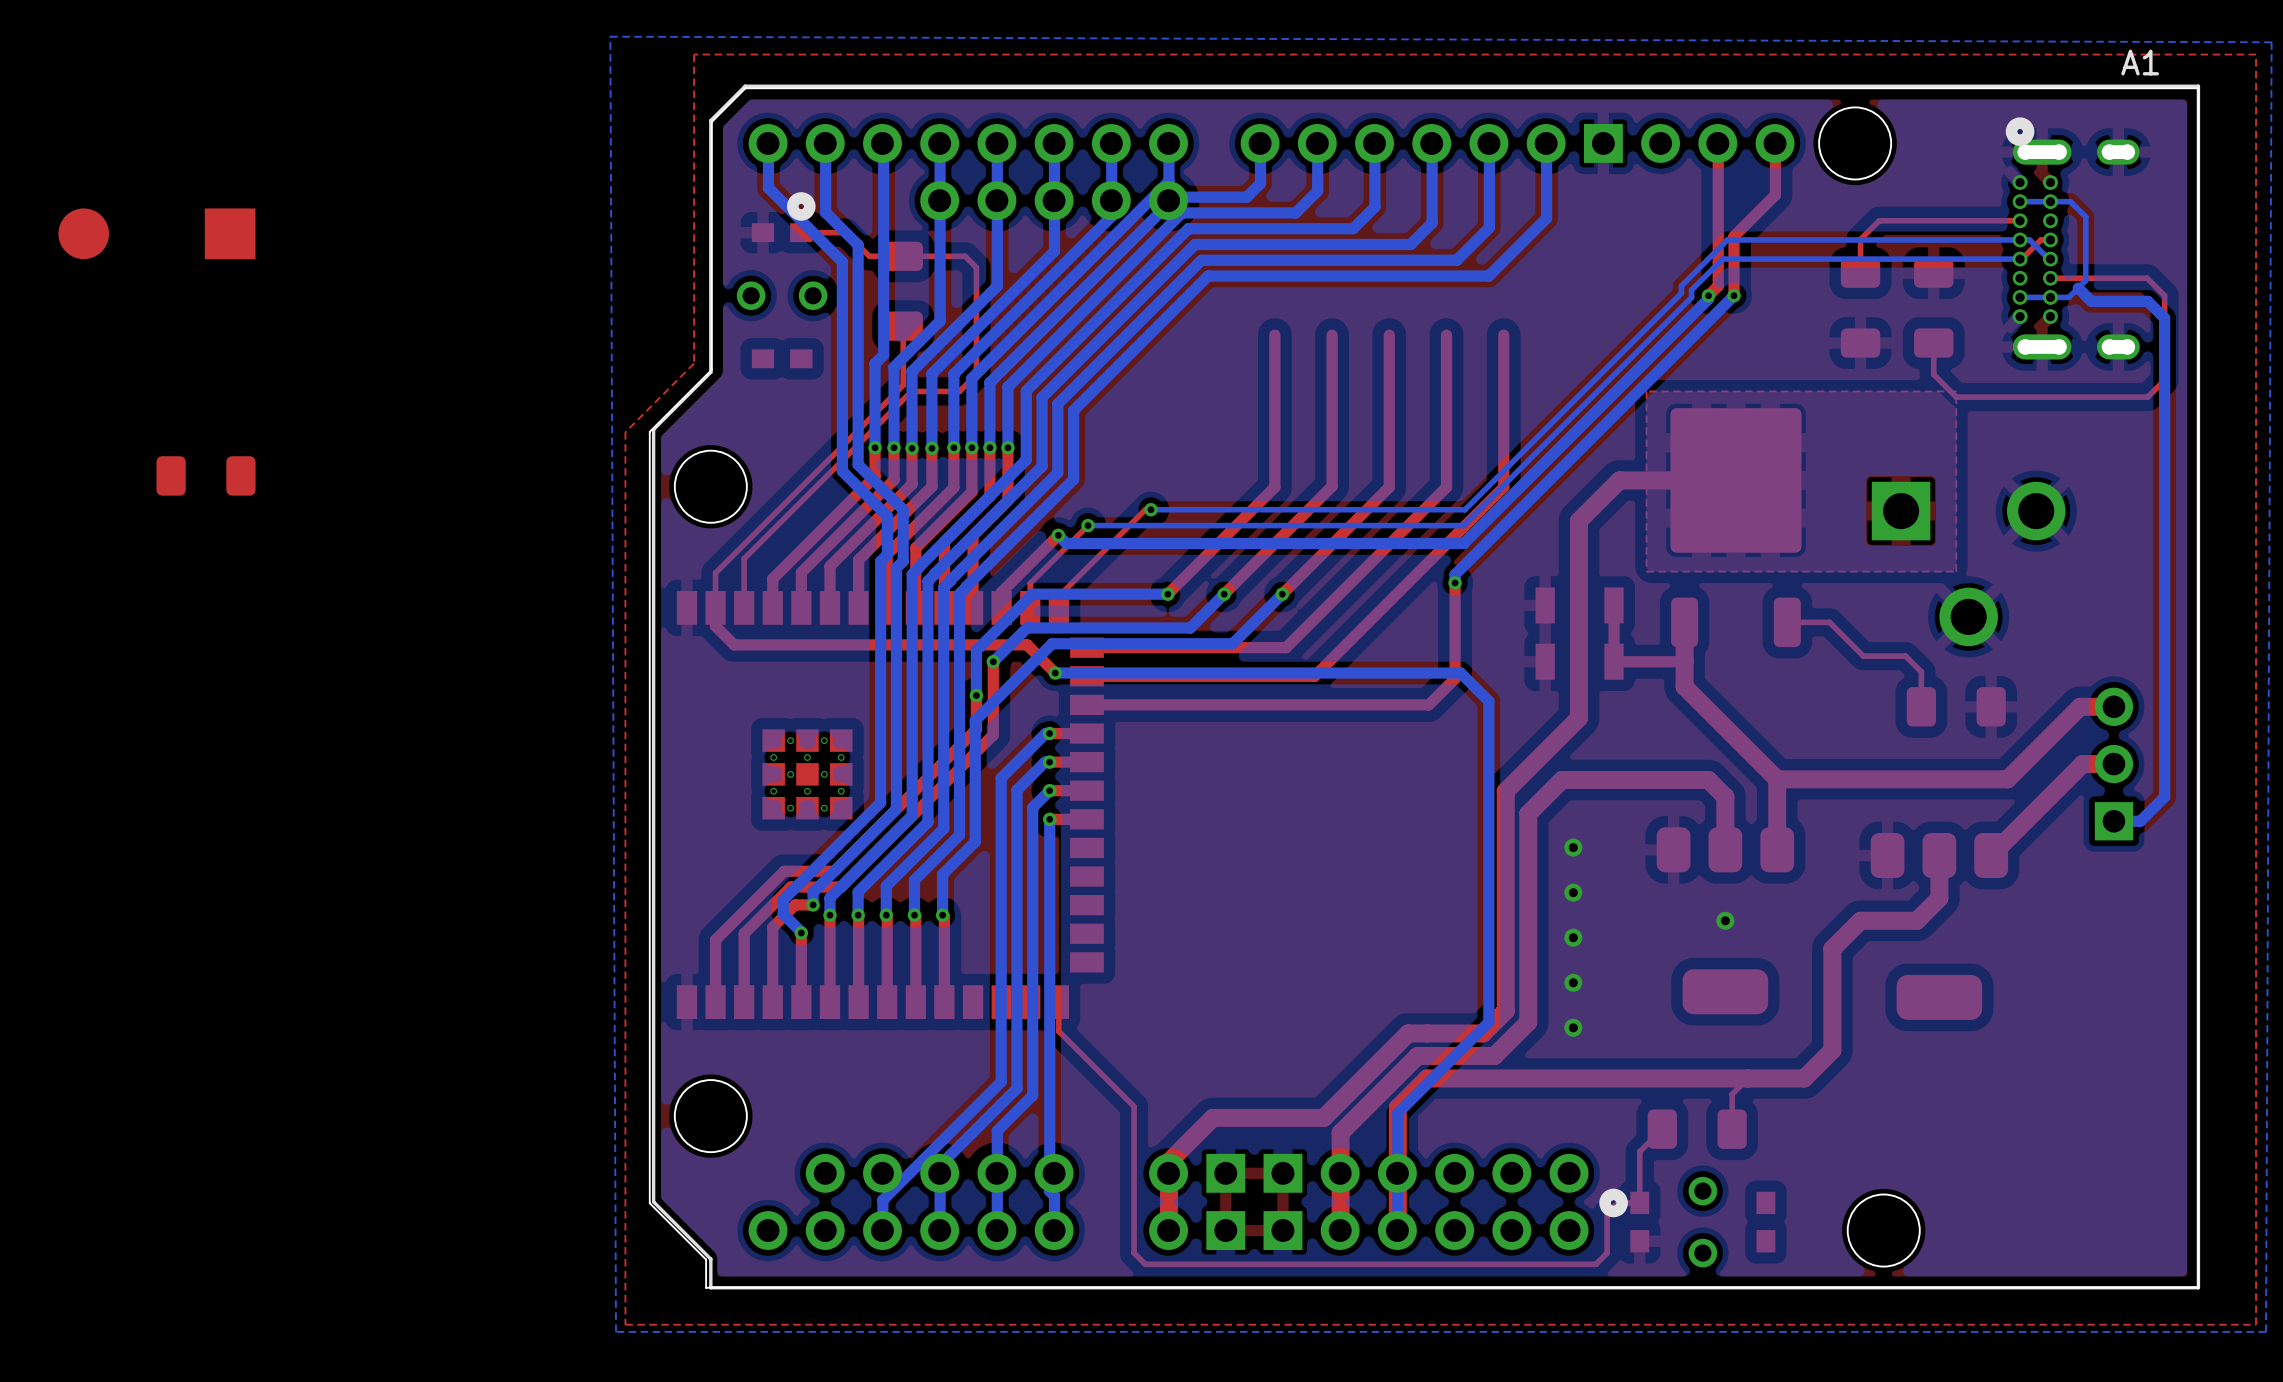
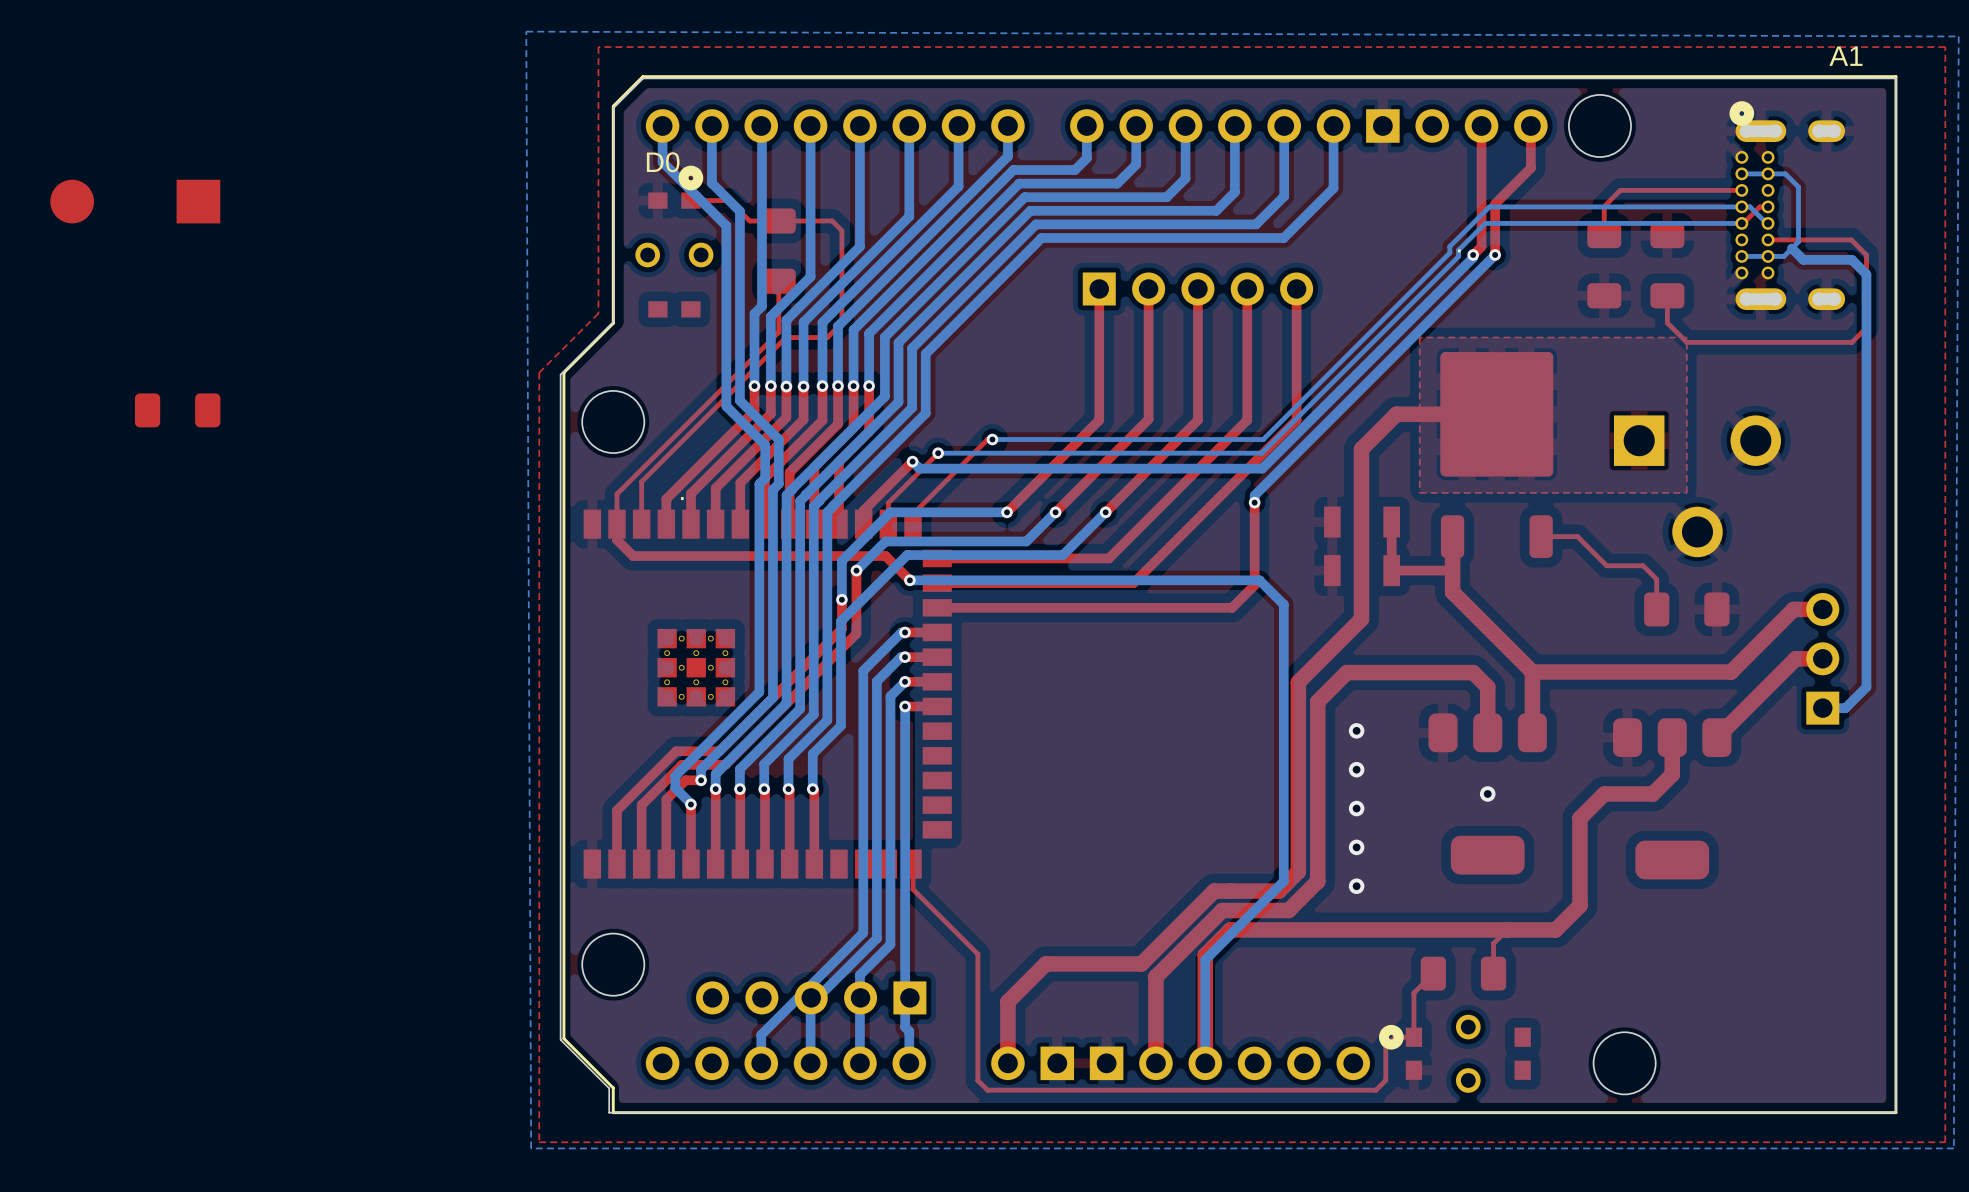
A1 footprint: [649, 84, 2201, 1290] -> [560, 75, 1898, 1115]
part: none -> (1197, 288)
part: none -> (811, 997)

